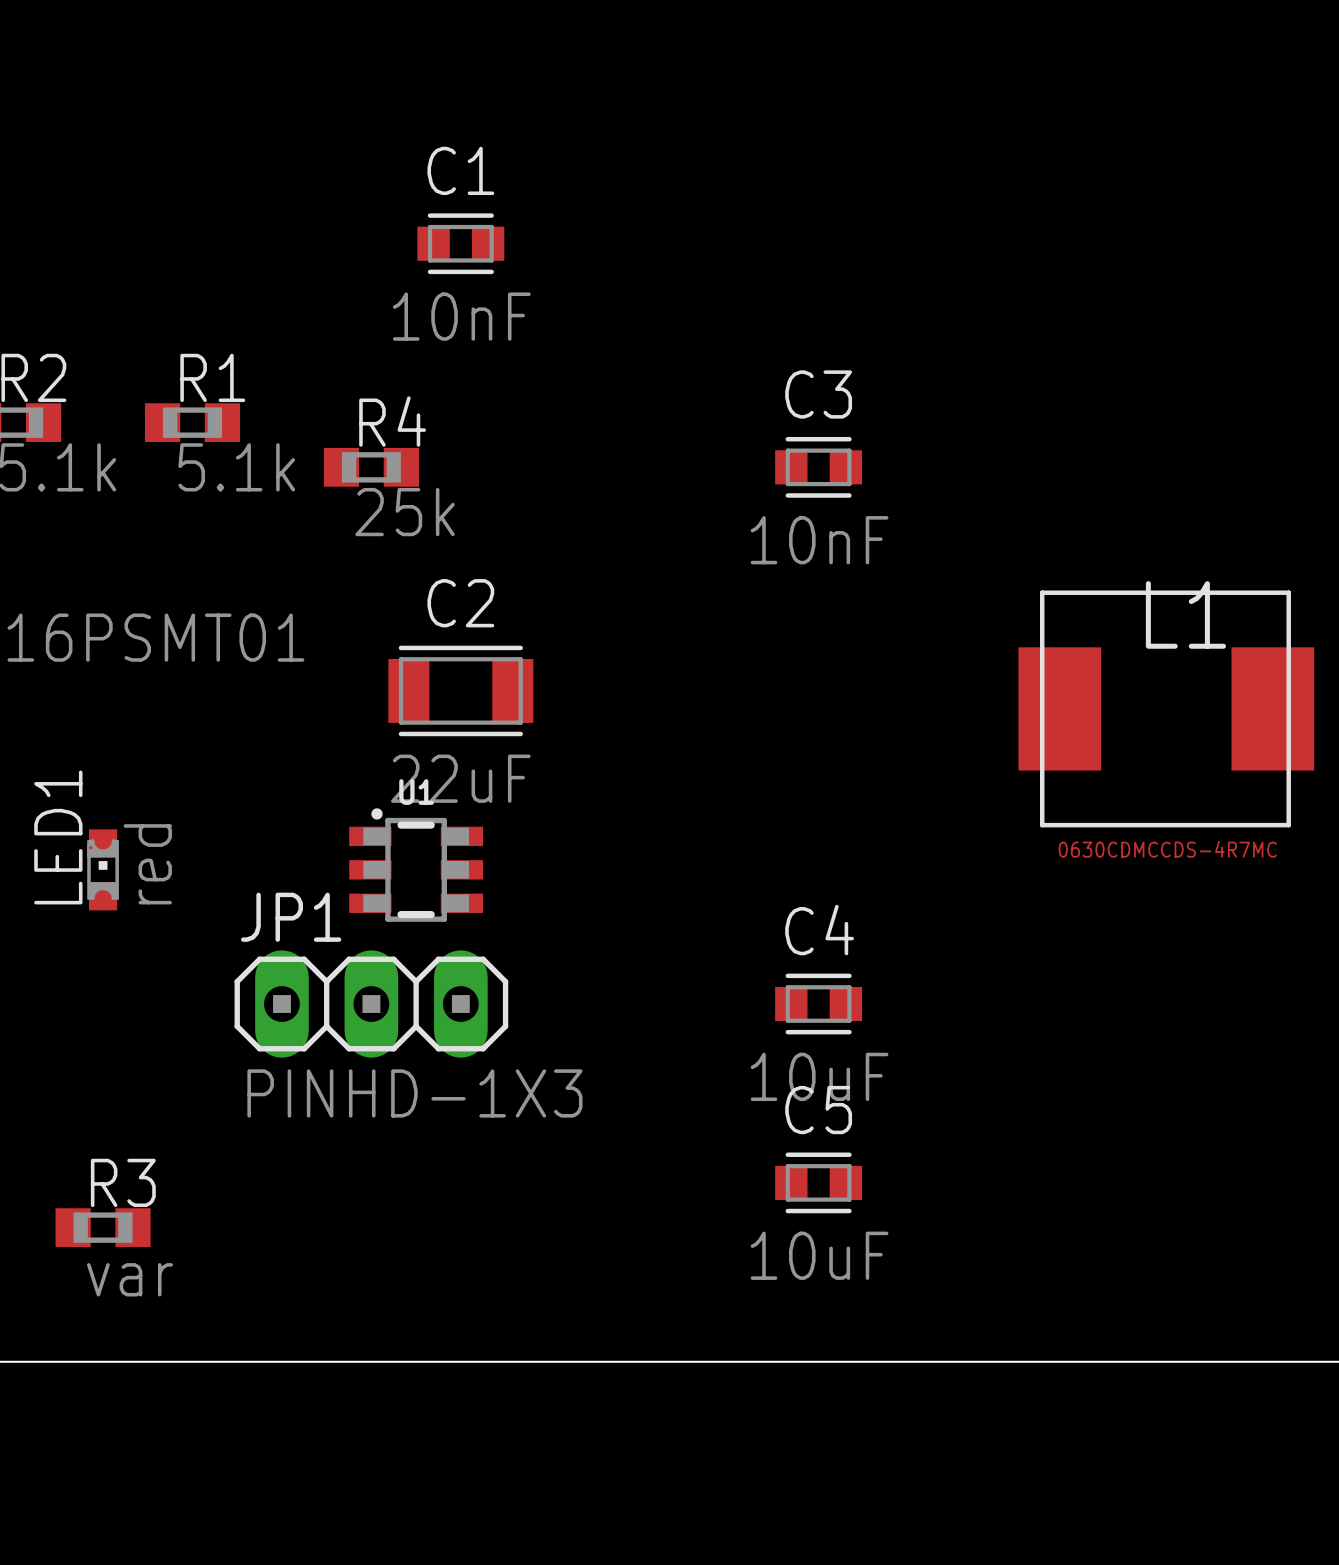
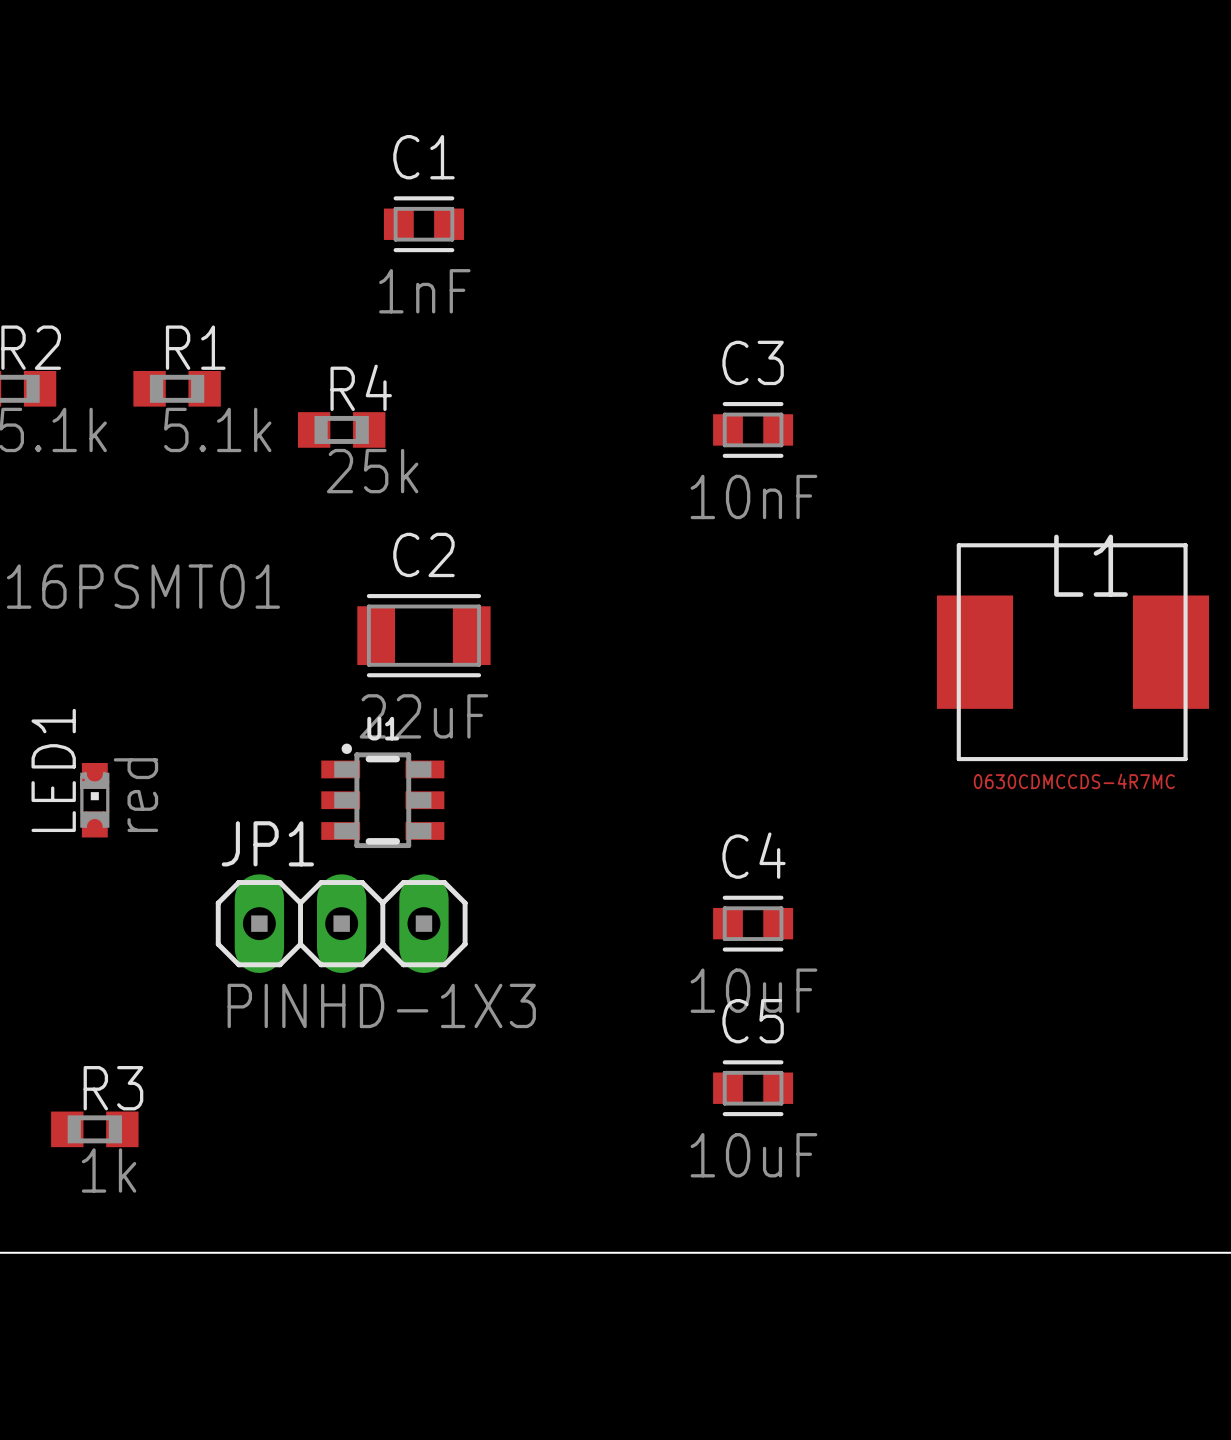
C1 value: 10nF (461, 316) -> 1nF (424, 291)
R3 value: var (130, 1279) -> 1k (109, 1170)

